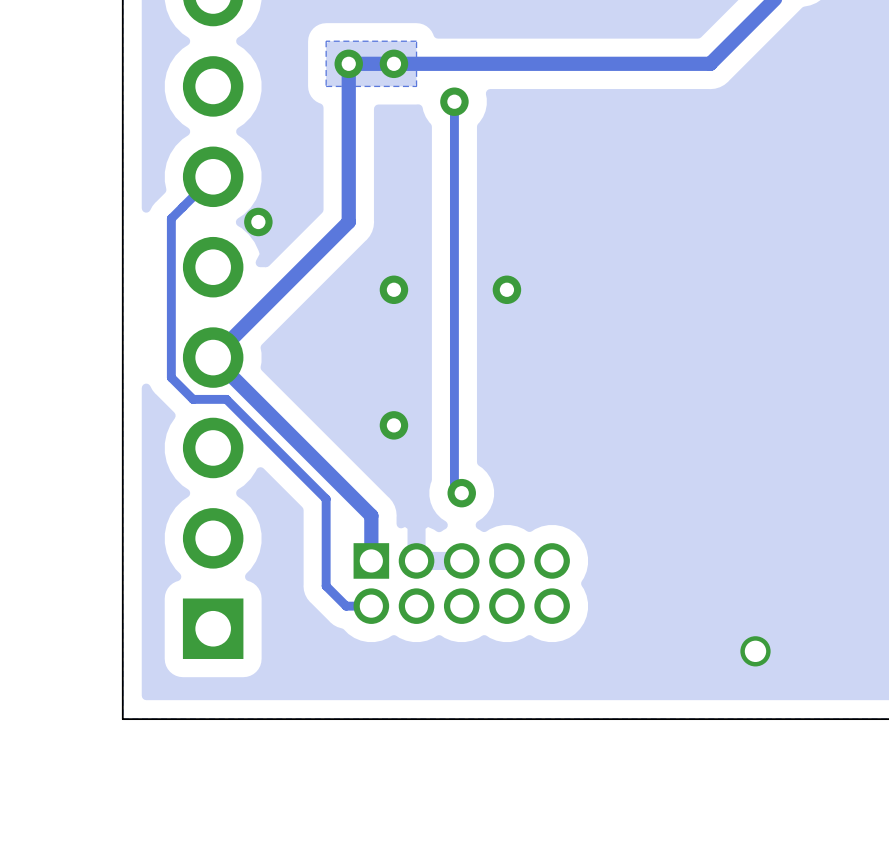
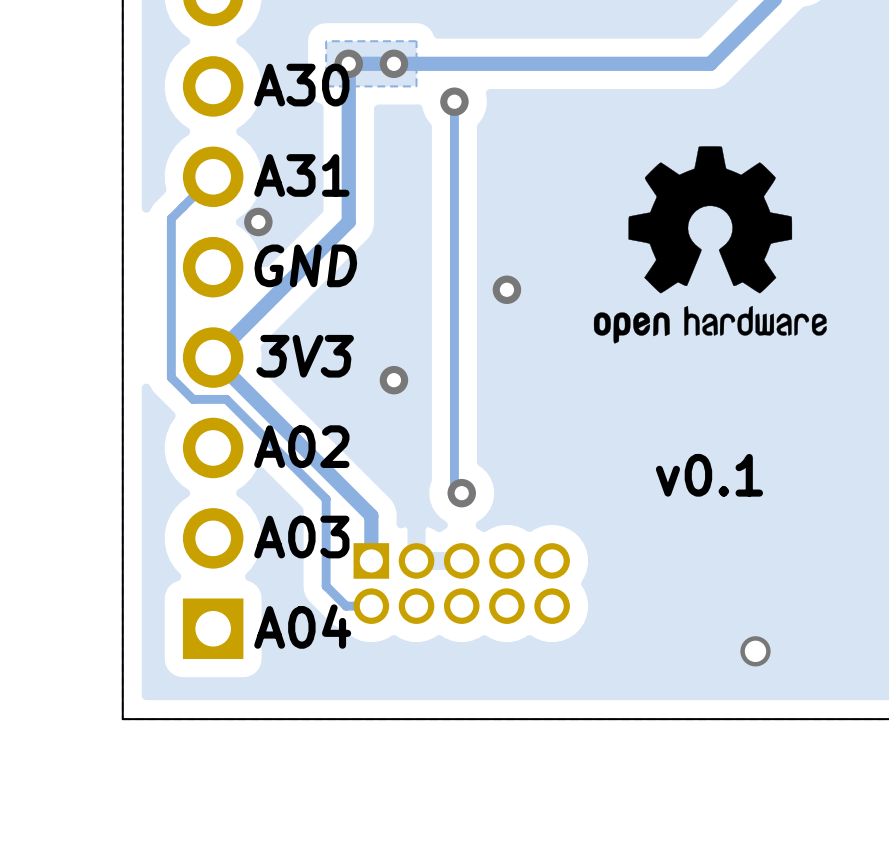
text: none -> A30 (301, 85)
drawing: none -> [593, 146, 827, 344]
text: none -> A31 (301, 175)
text: none -> GND (305, 265)
via: (393, 289) -> none
text: none -> 3V3 (305, 356)
via: none -> (393, 380)
via: (393, 425) -> none
text: none -> A02 (301, 446)
text: none -> v0.1 (709, 475)
text: none -> A03 (301, 537)
text: none -> A04 (302, 626)

